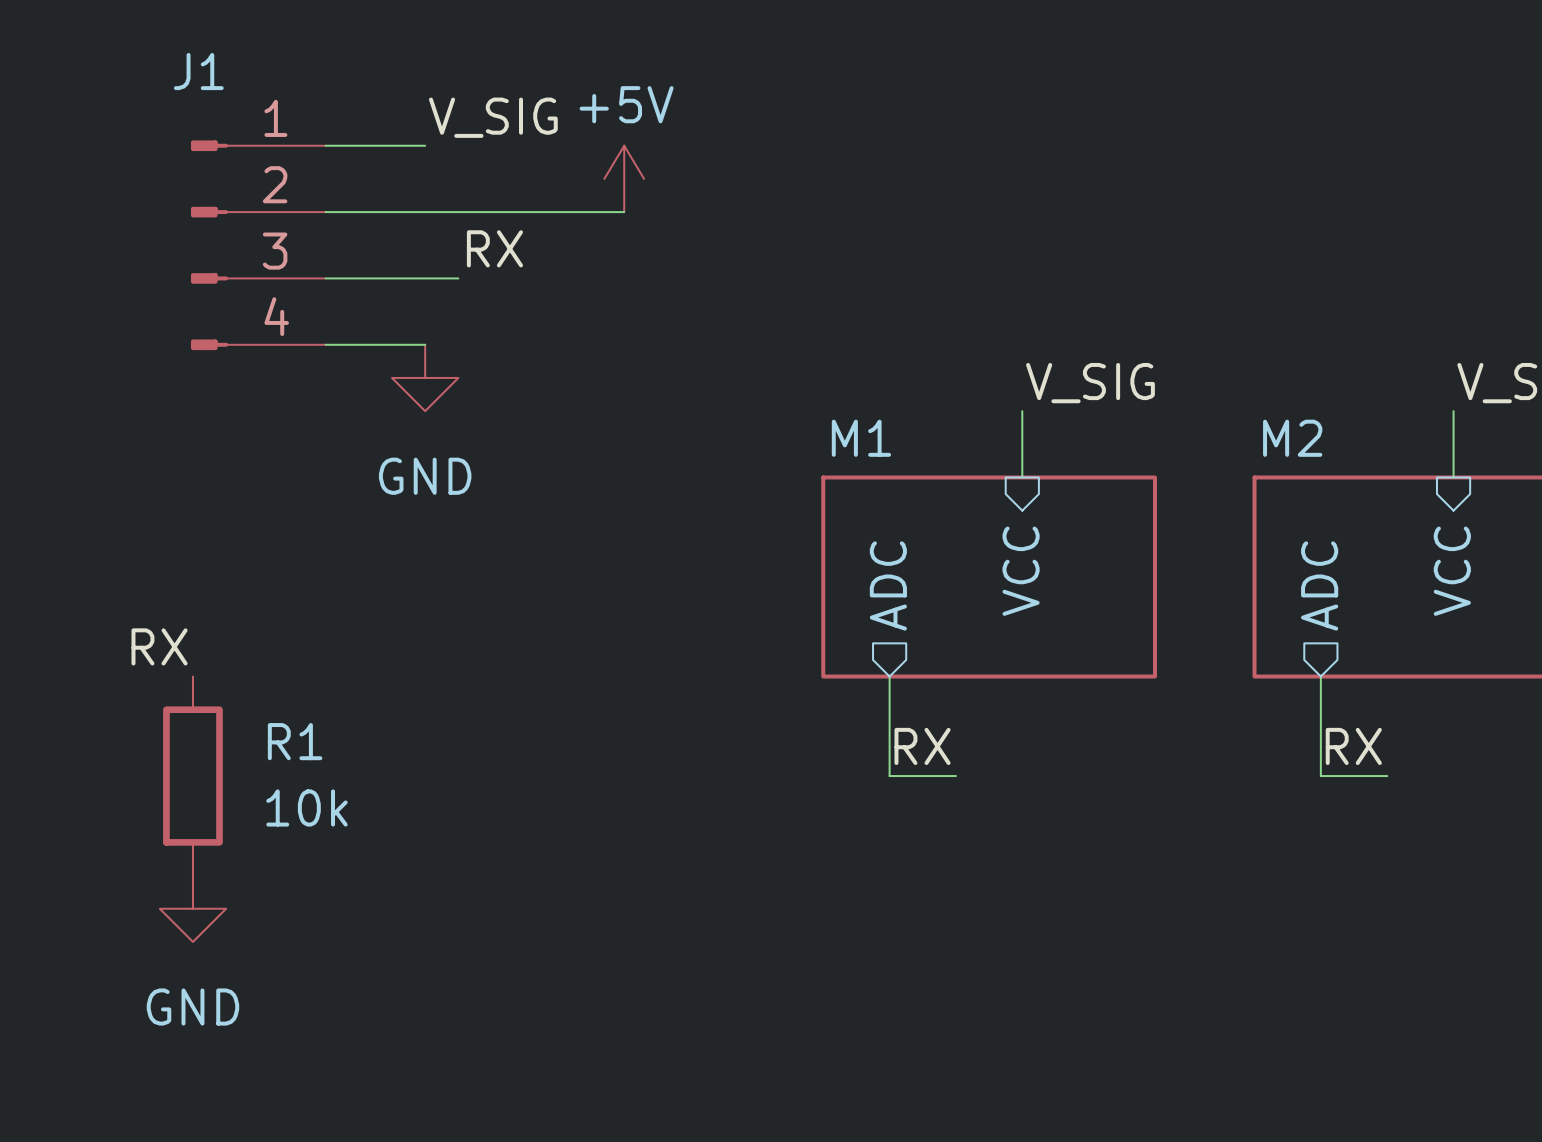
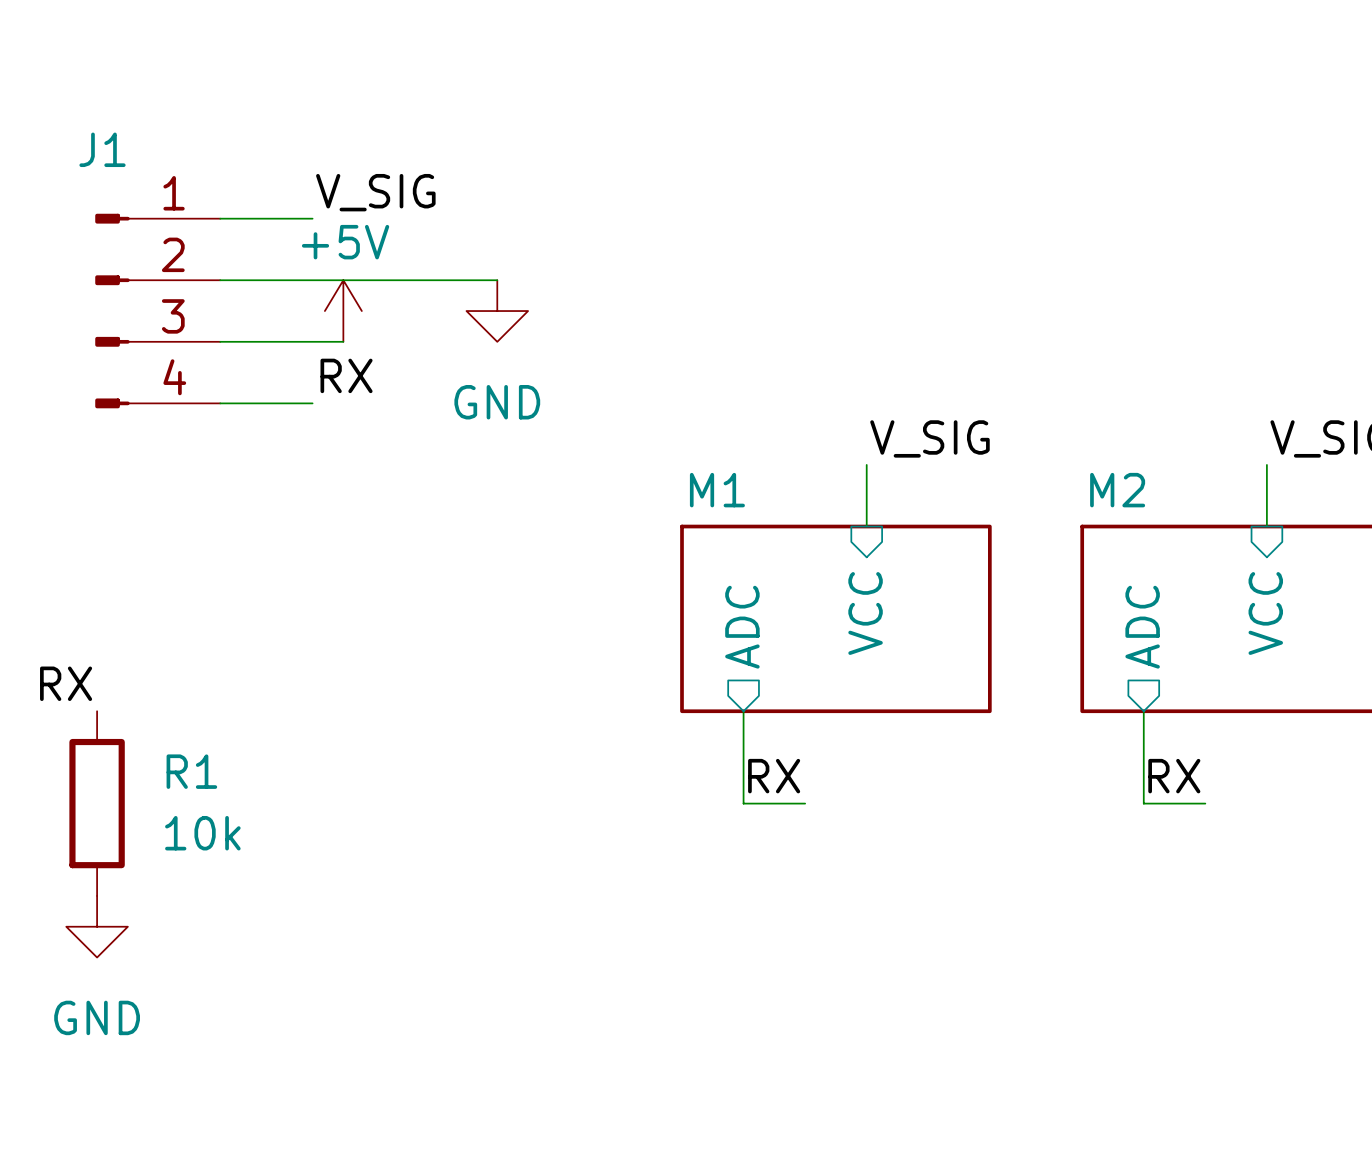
power symbol position: +5V (624, 178) -> +5V (343, 311)
label position: RX (494, 248) -> RX (346, 375)
power symbol position: GND (425, 377) -> GND (497, 311)

